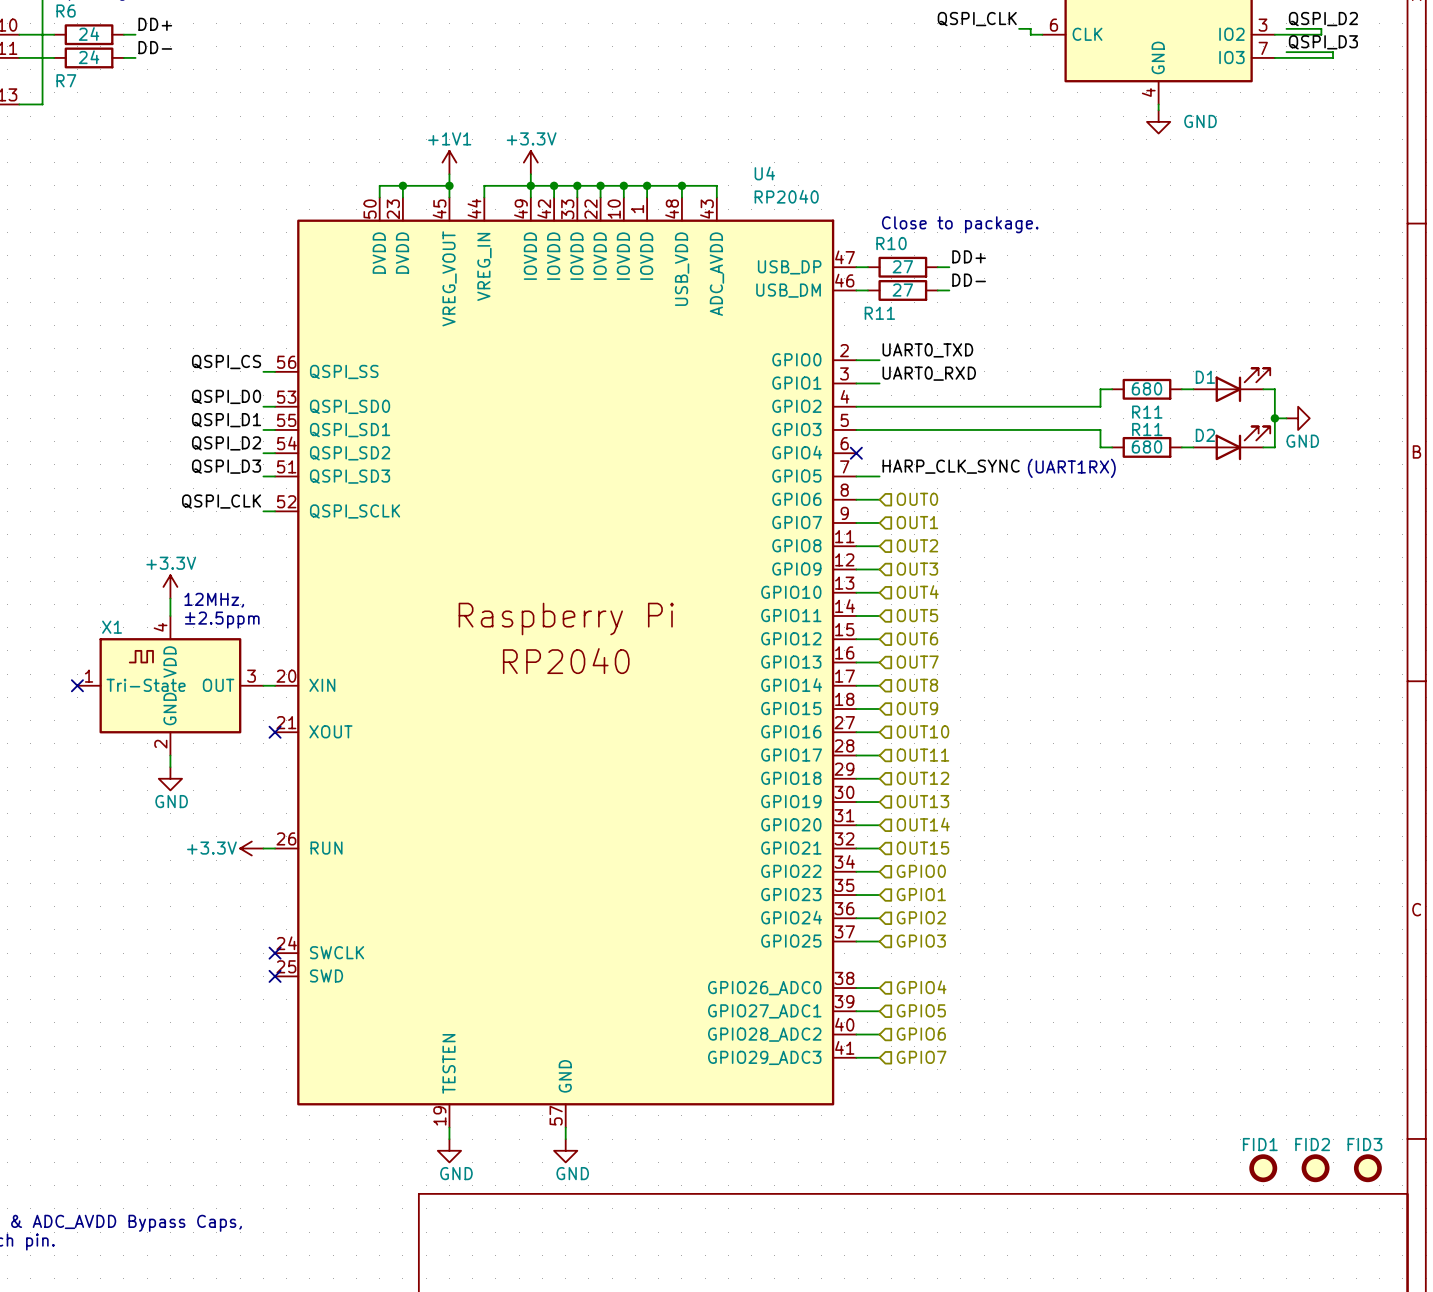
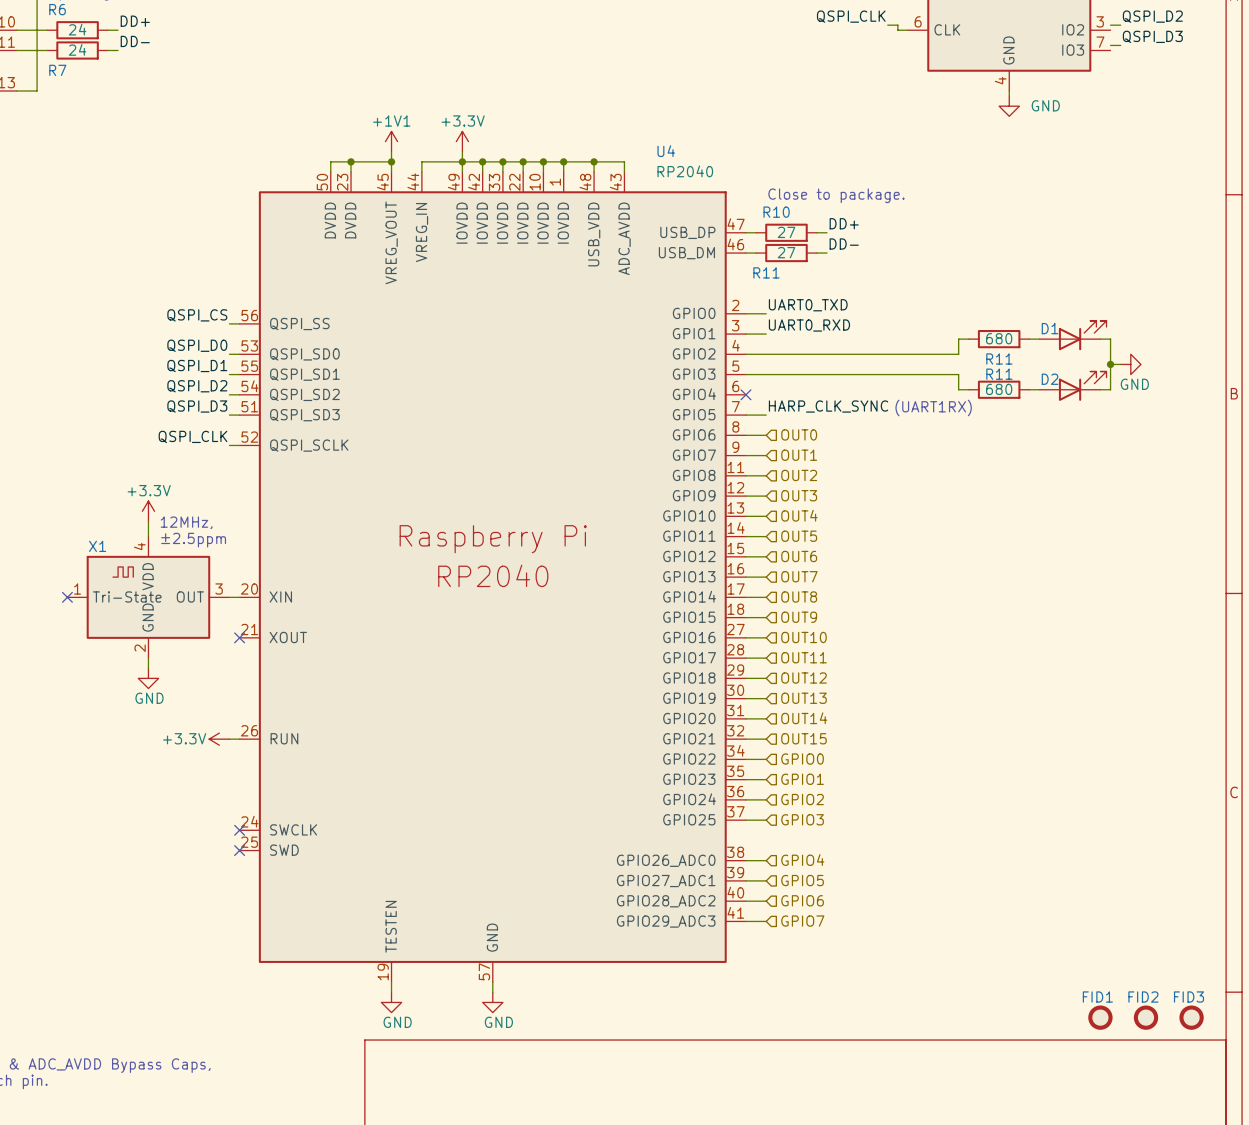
wire: (1286, 28) (1321, 28) (1321, 34) (1274, 34) -> (1120, 25) (1110, 25)
wire: (1286, 52) (1333, 52) (1333, 57) (1274, 57) -> (1120, 45) (1110, 45)

